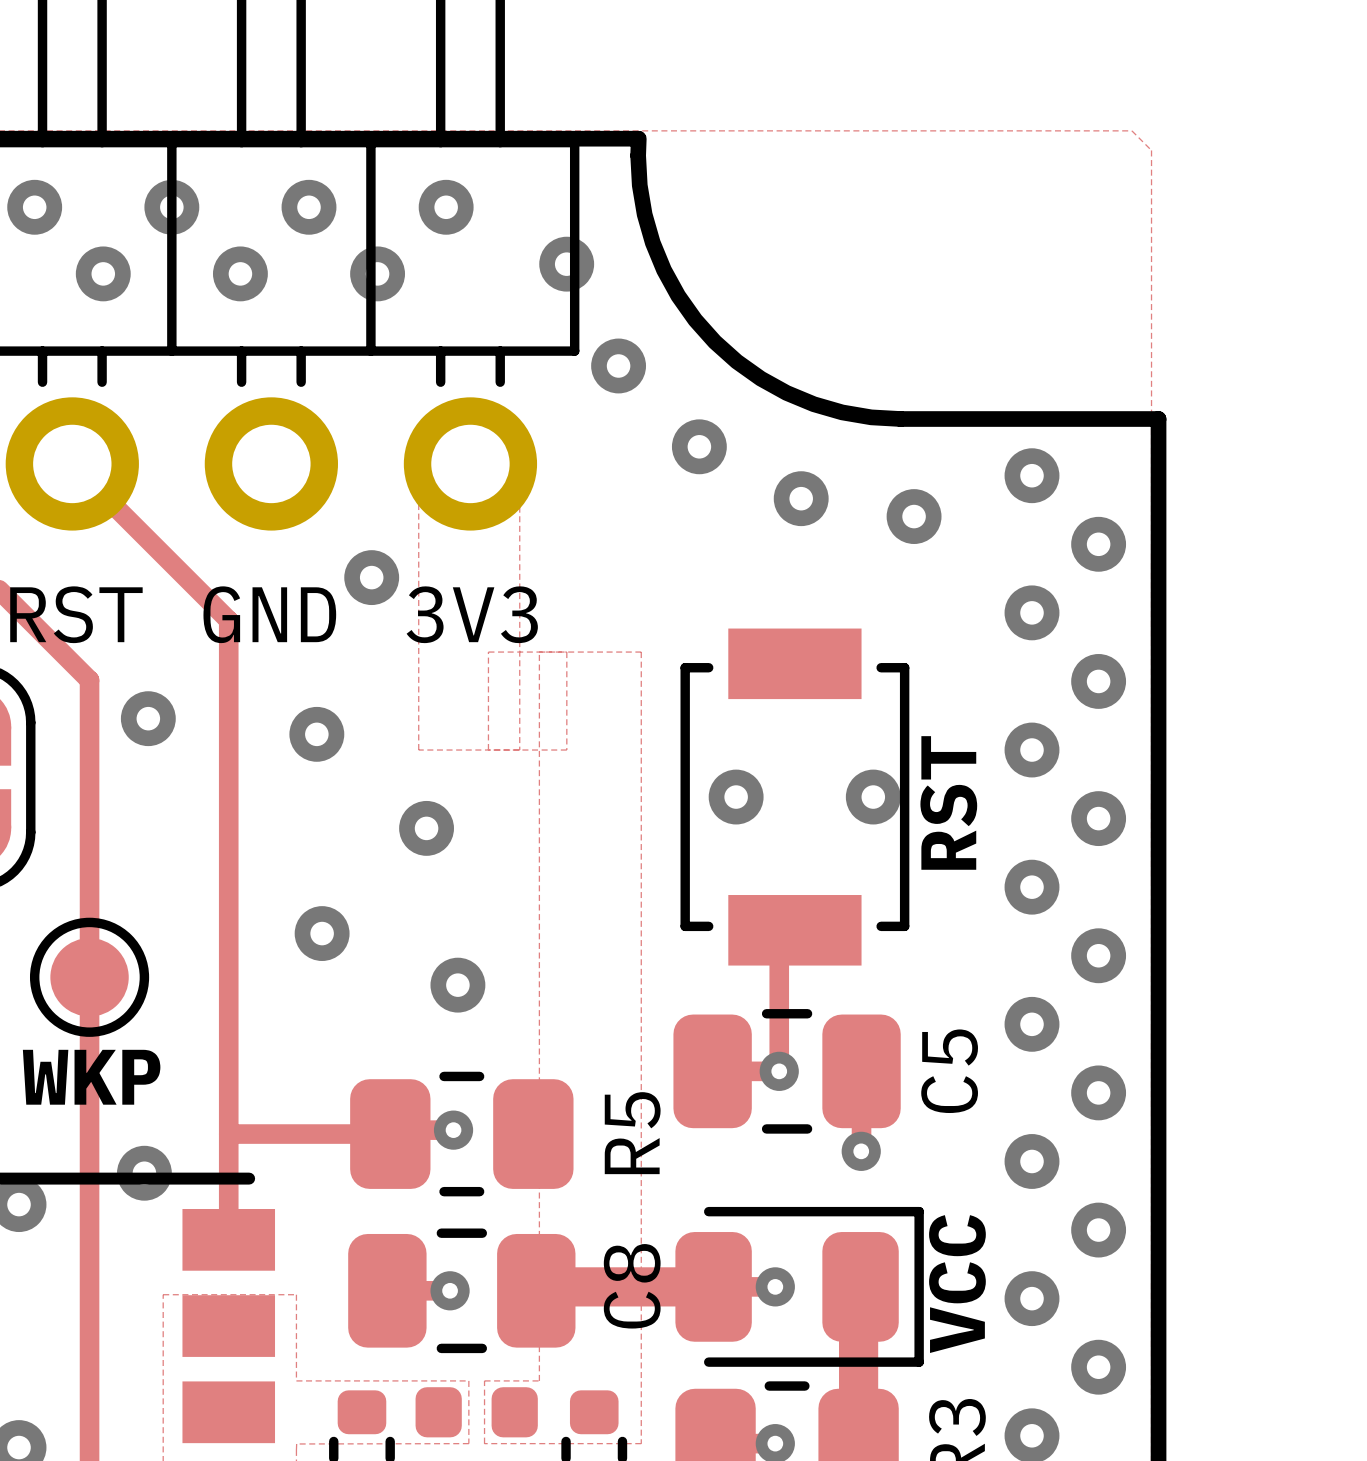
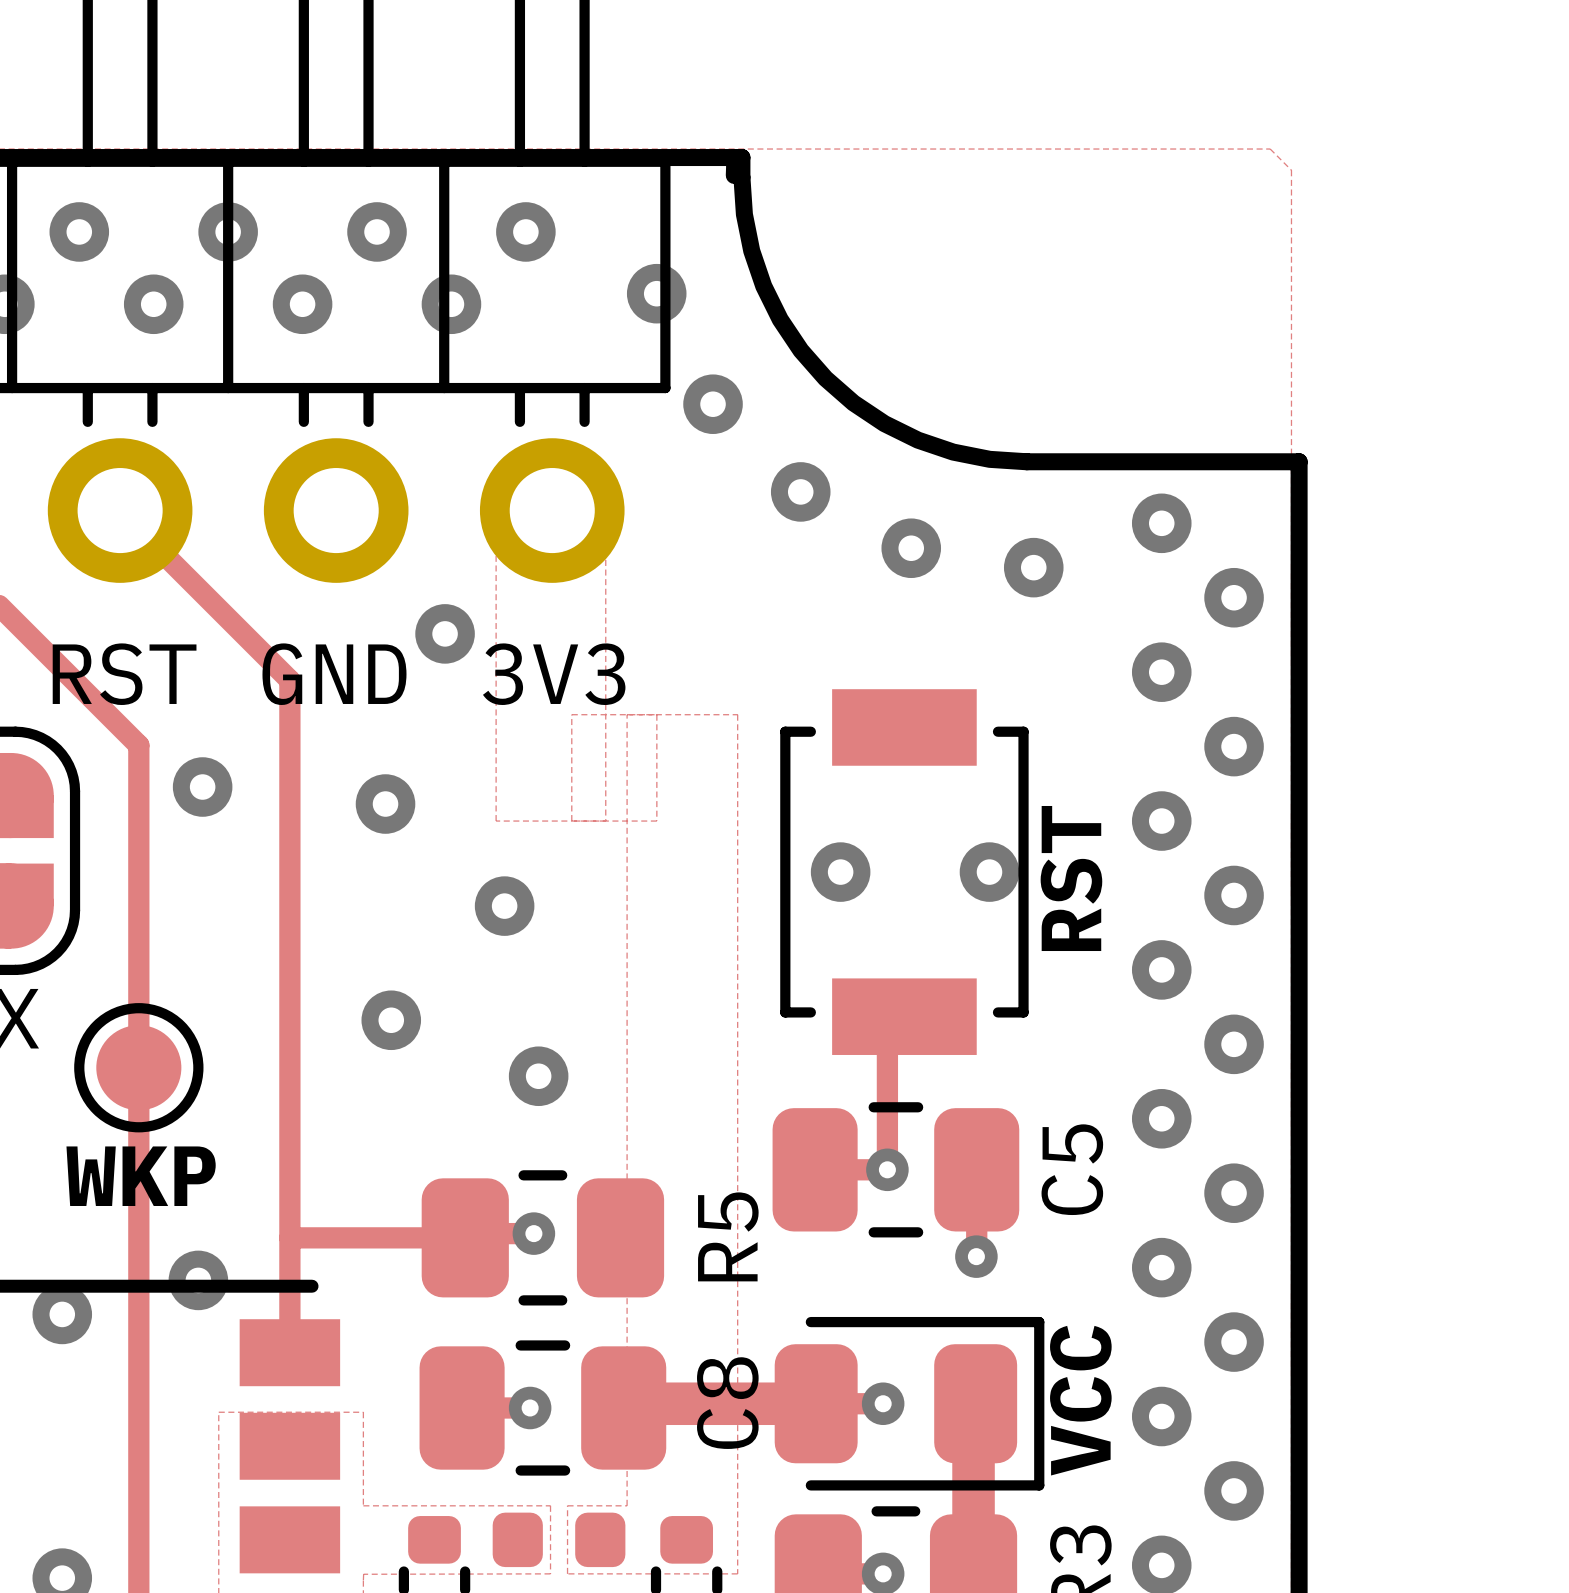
board edge: (638, 155) (639, 185) (644, 214) (652, 242) (664, 270) (678, 295) (695, 319) (714, 341) (736, 361) (760, 378) (786, 392) (813, 404) (842, 412) (871, 417) (907, 419) -> (734, 157) (741, 157) (744, 214) (751, 250) (763, 286) (780, 319) (800, 350) (825, 378) (853, 403) (884, 423) (917, 440) (953, 452) (989, 459) (1026, 461)

